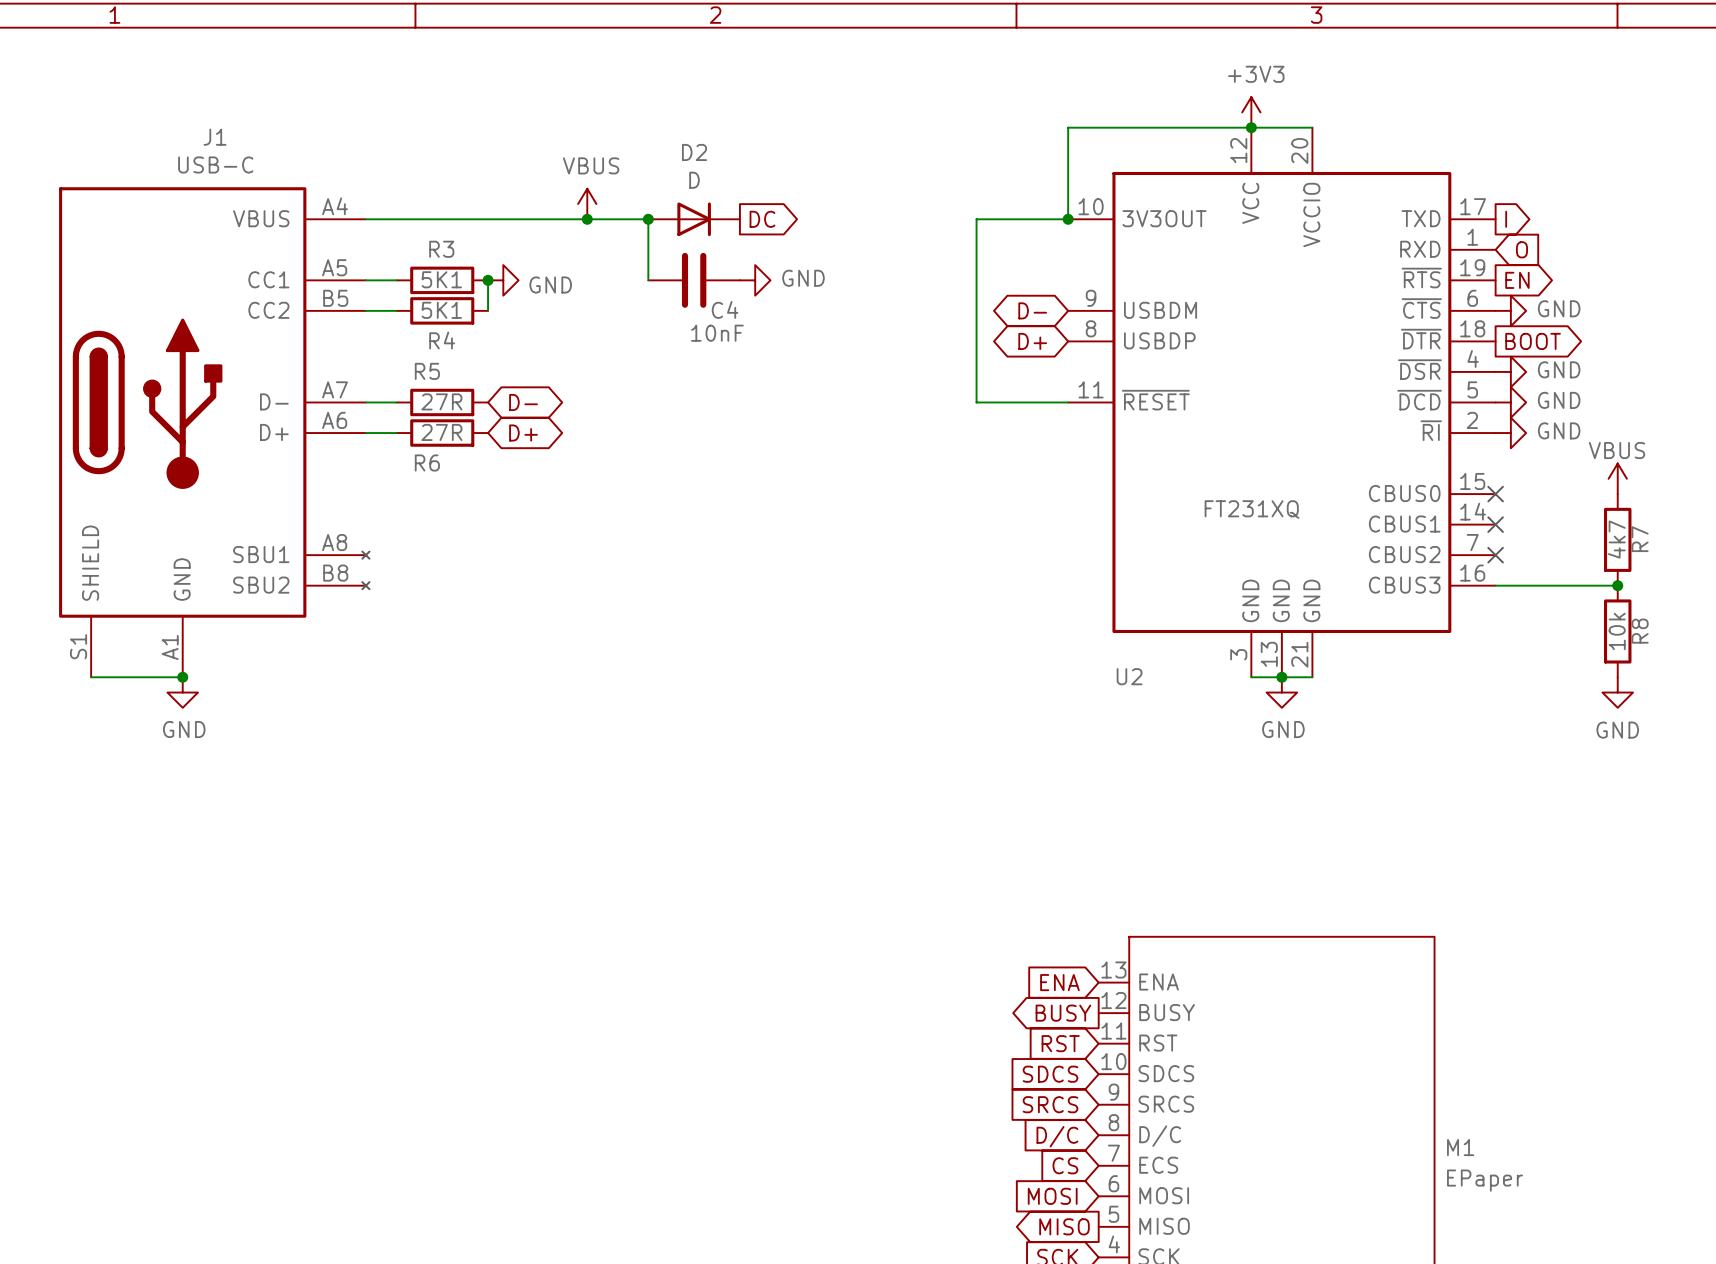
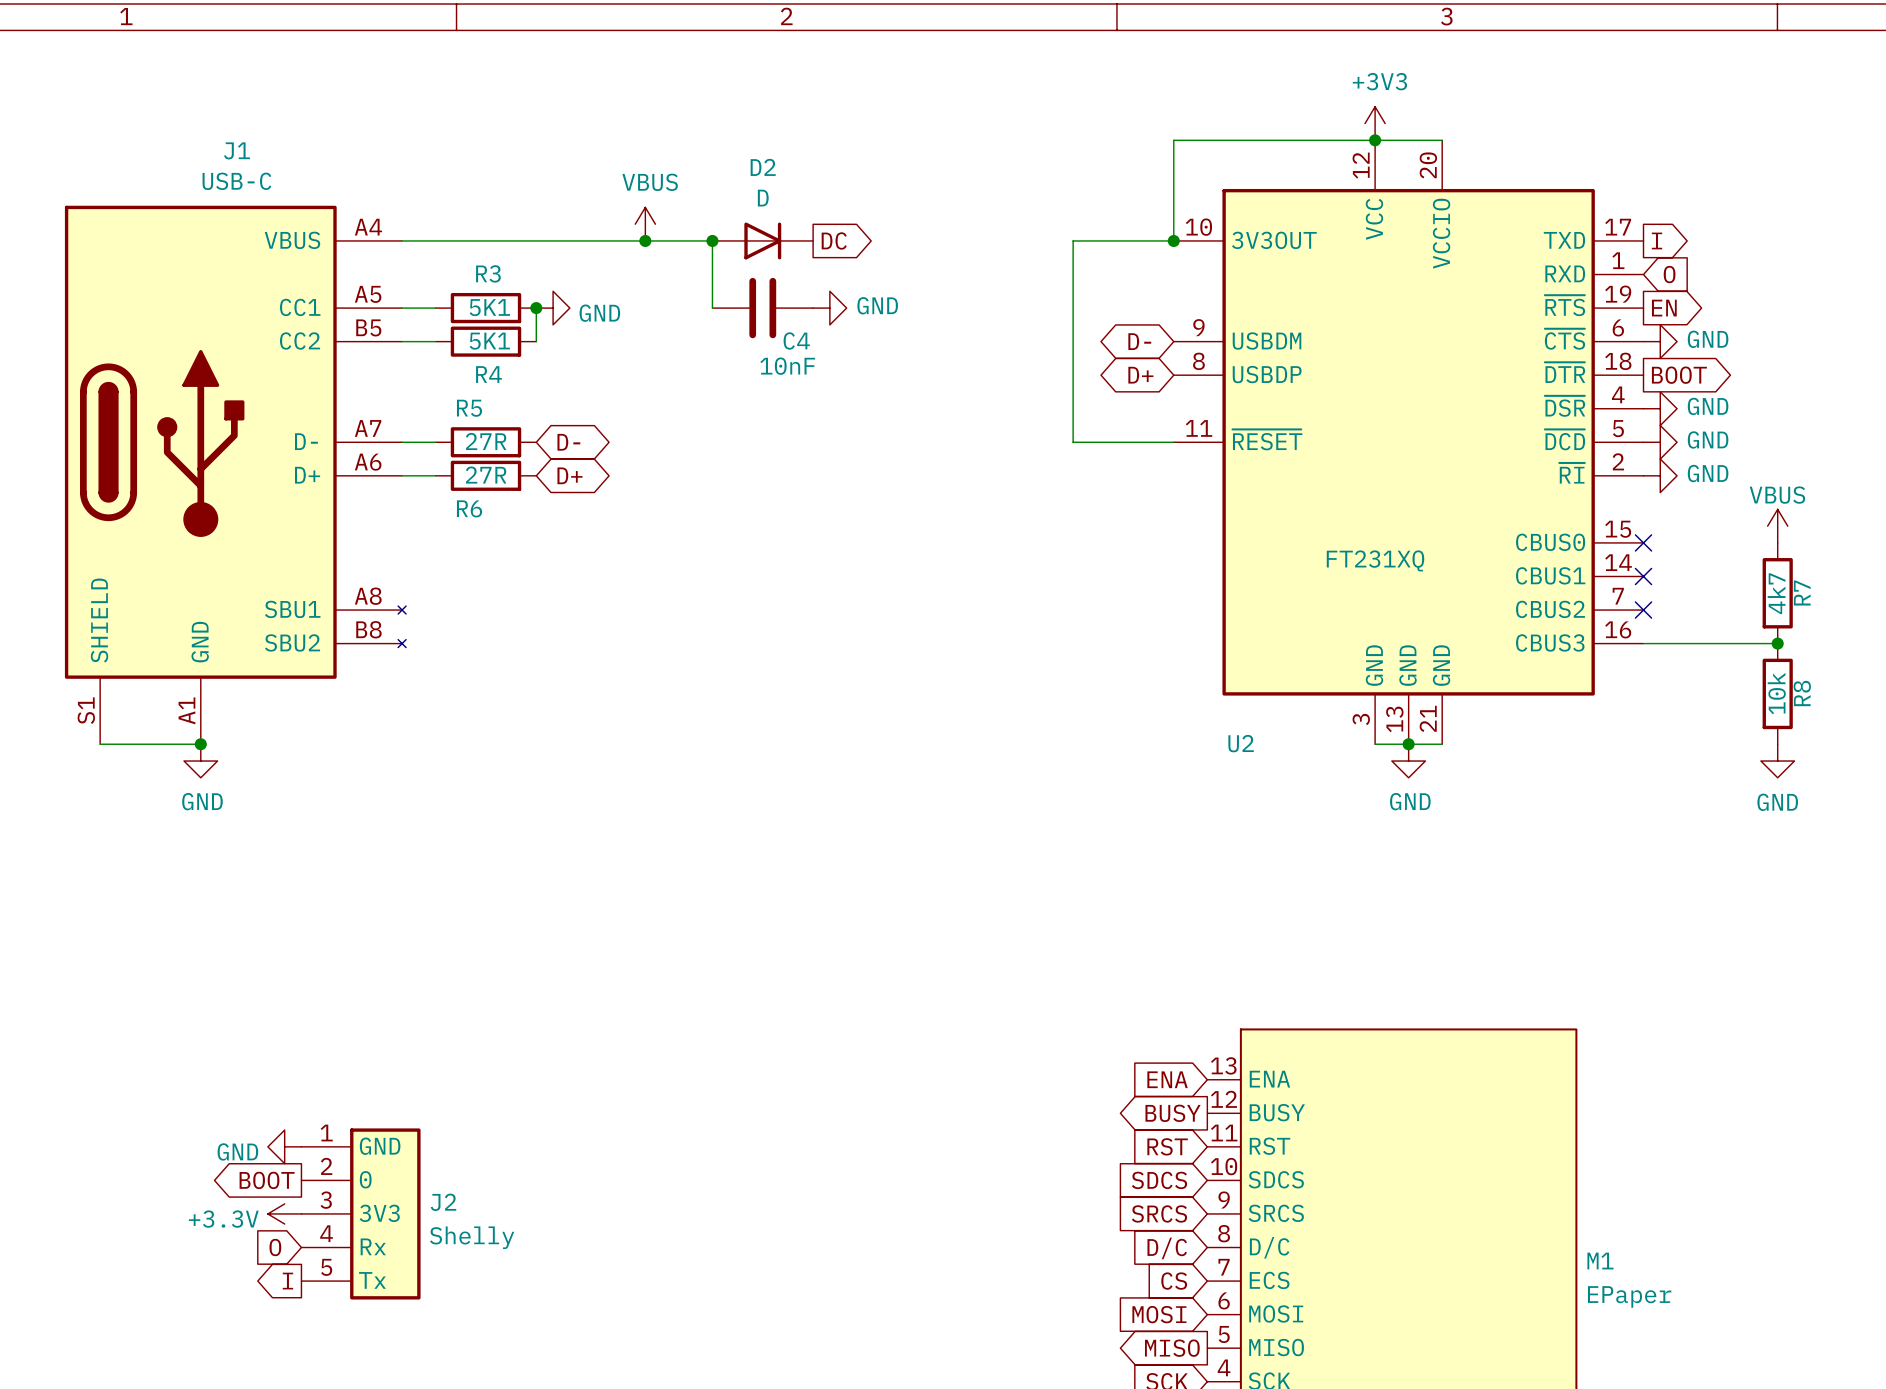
power symbol: none -> GND (284, 1146)
global label: none -> BOOT (267, 1180)
power symbol: none -> +3.3V (284, 1213)
J2: none -> Shelly (361, 1213)
global label: none -> O (275, 1247)
global label: none -> I (287, 1281)

